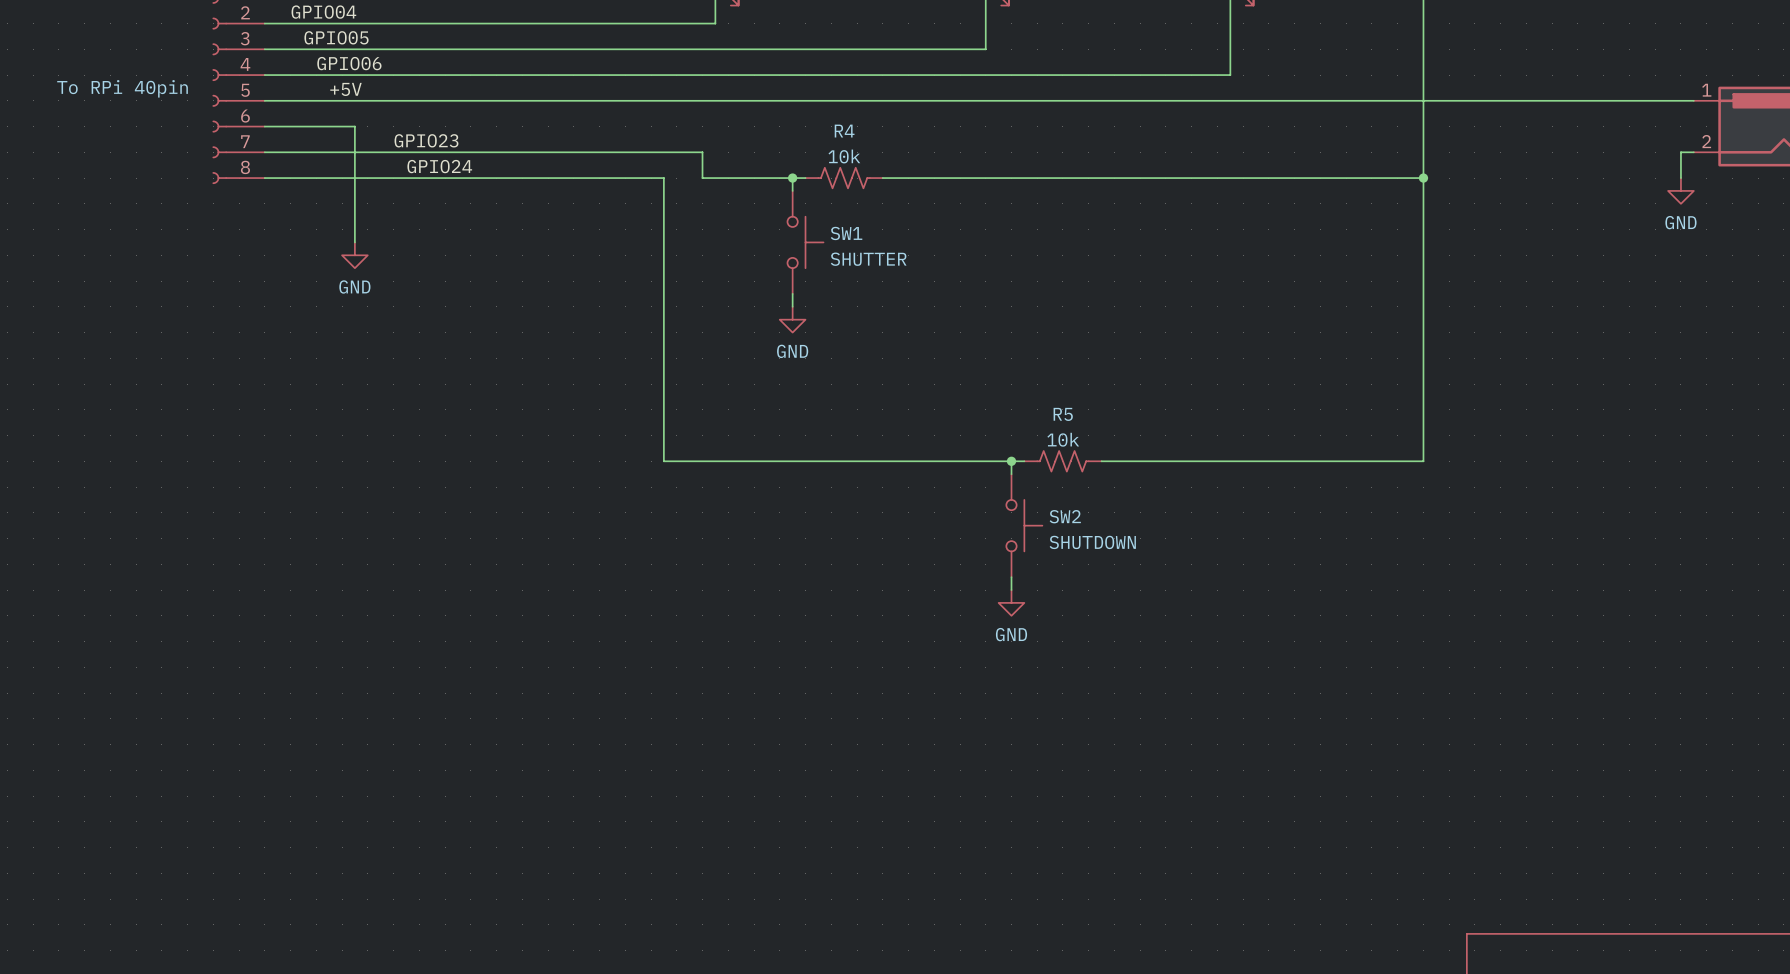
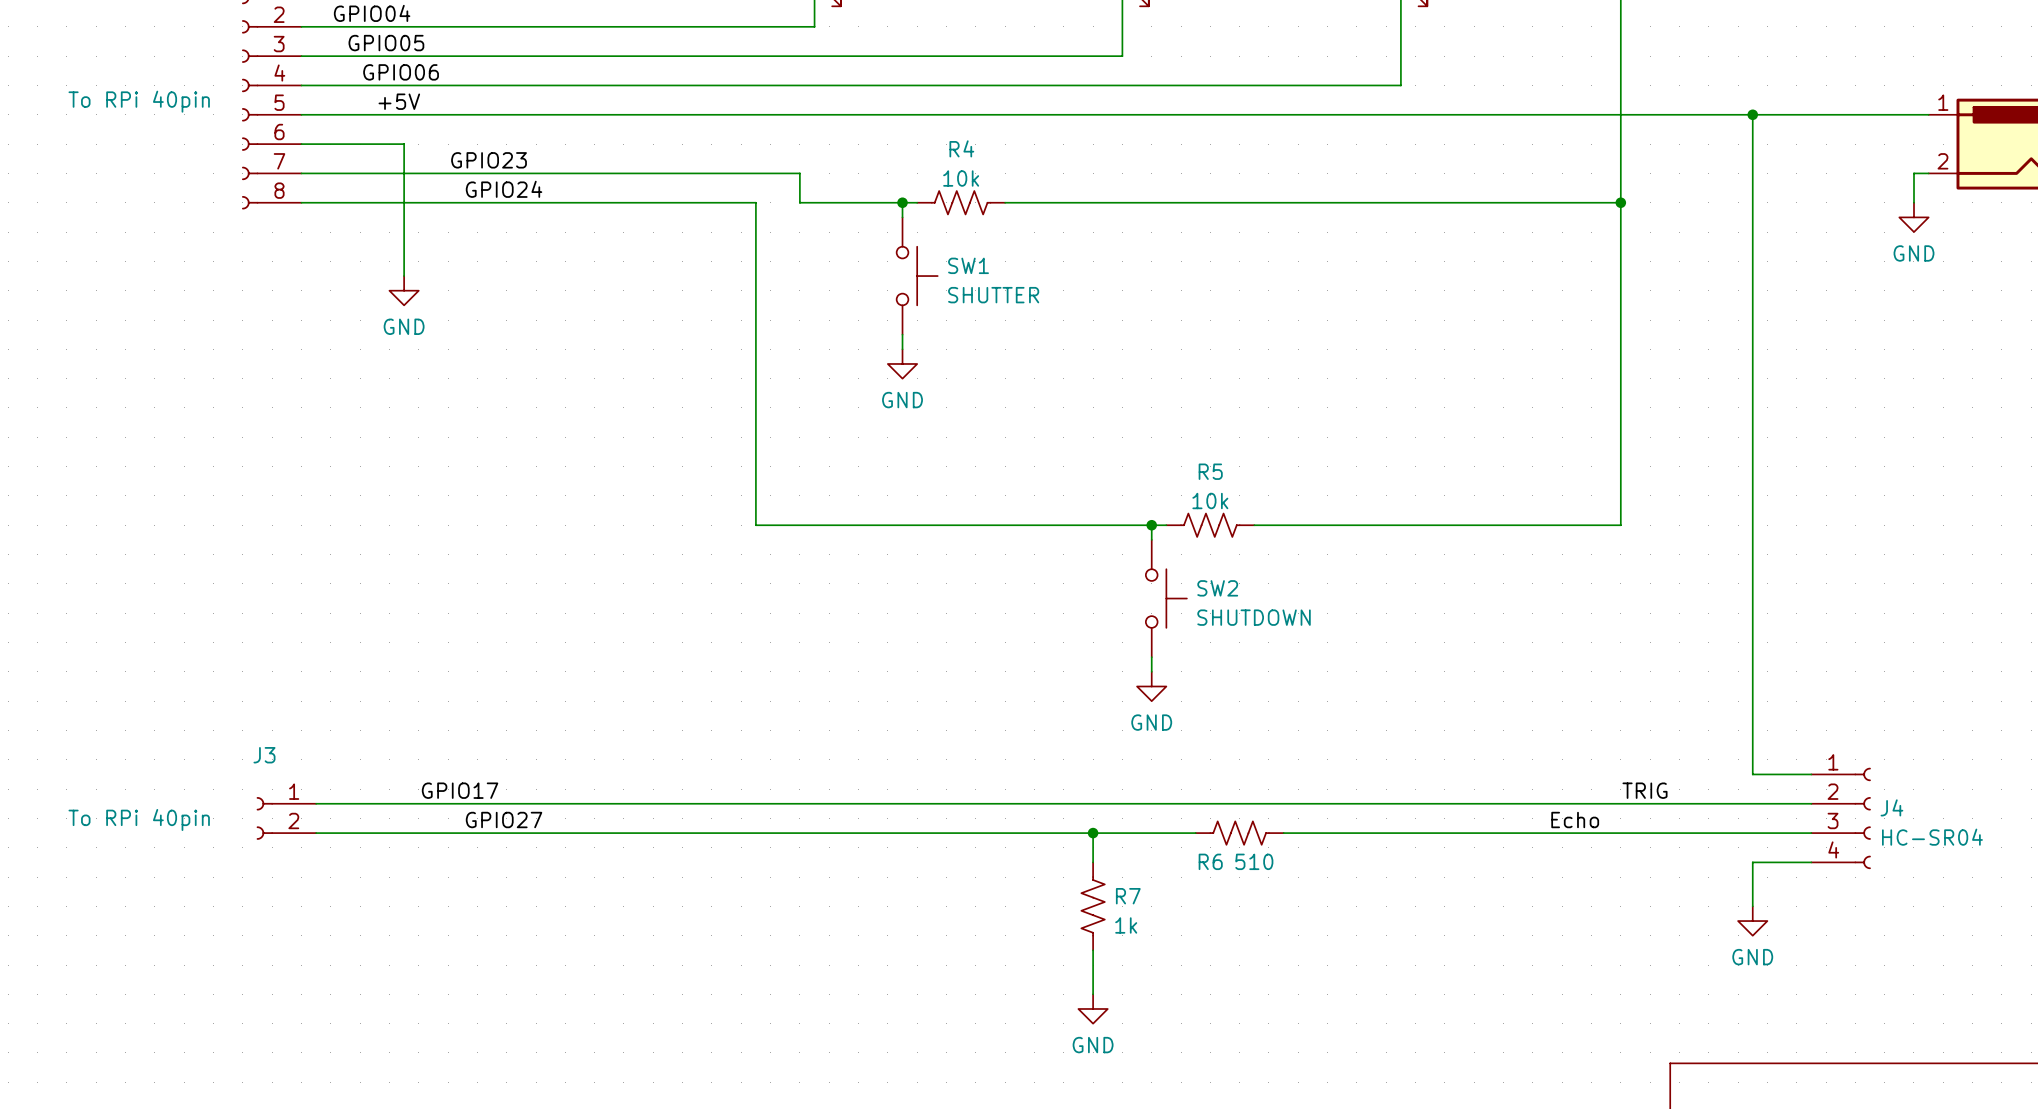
wire: none -> (1752, 114) (1752, 774) (1811, 774)
junction: none -> (1752, 114)
label: none -> GPIO17 (460, 790)
label: none -> TRIG (1645, 790)
wire: none -> (316, 803) (1811, 803)
J3: none -> To RPi 40pin (286, 818)
J4: none -> HC-SR04 (1841, 818)
label: none -> Echo (1575, 820)
label: none -> GPIO27 (504, 820)
wire: none -> (316, 833) (1195, 833)
wire: none -> (1093, 833) (1093, 862)
junction: none -> (1093, 833)
R6: none -> 510 (1239, 833)
wire: none -> (1283, 833) (1811, 833)
wire: none -> (1811, 862) (1752, 862) (1752, 906)
R7: none -> 1k (1093, 906)
power symbol: none -> GND (1752, 921)
wire: none -> (1093, 950) (1093, 994)
power symbol: none -> GND (1093, 1008)

